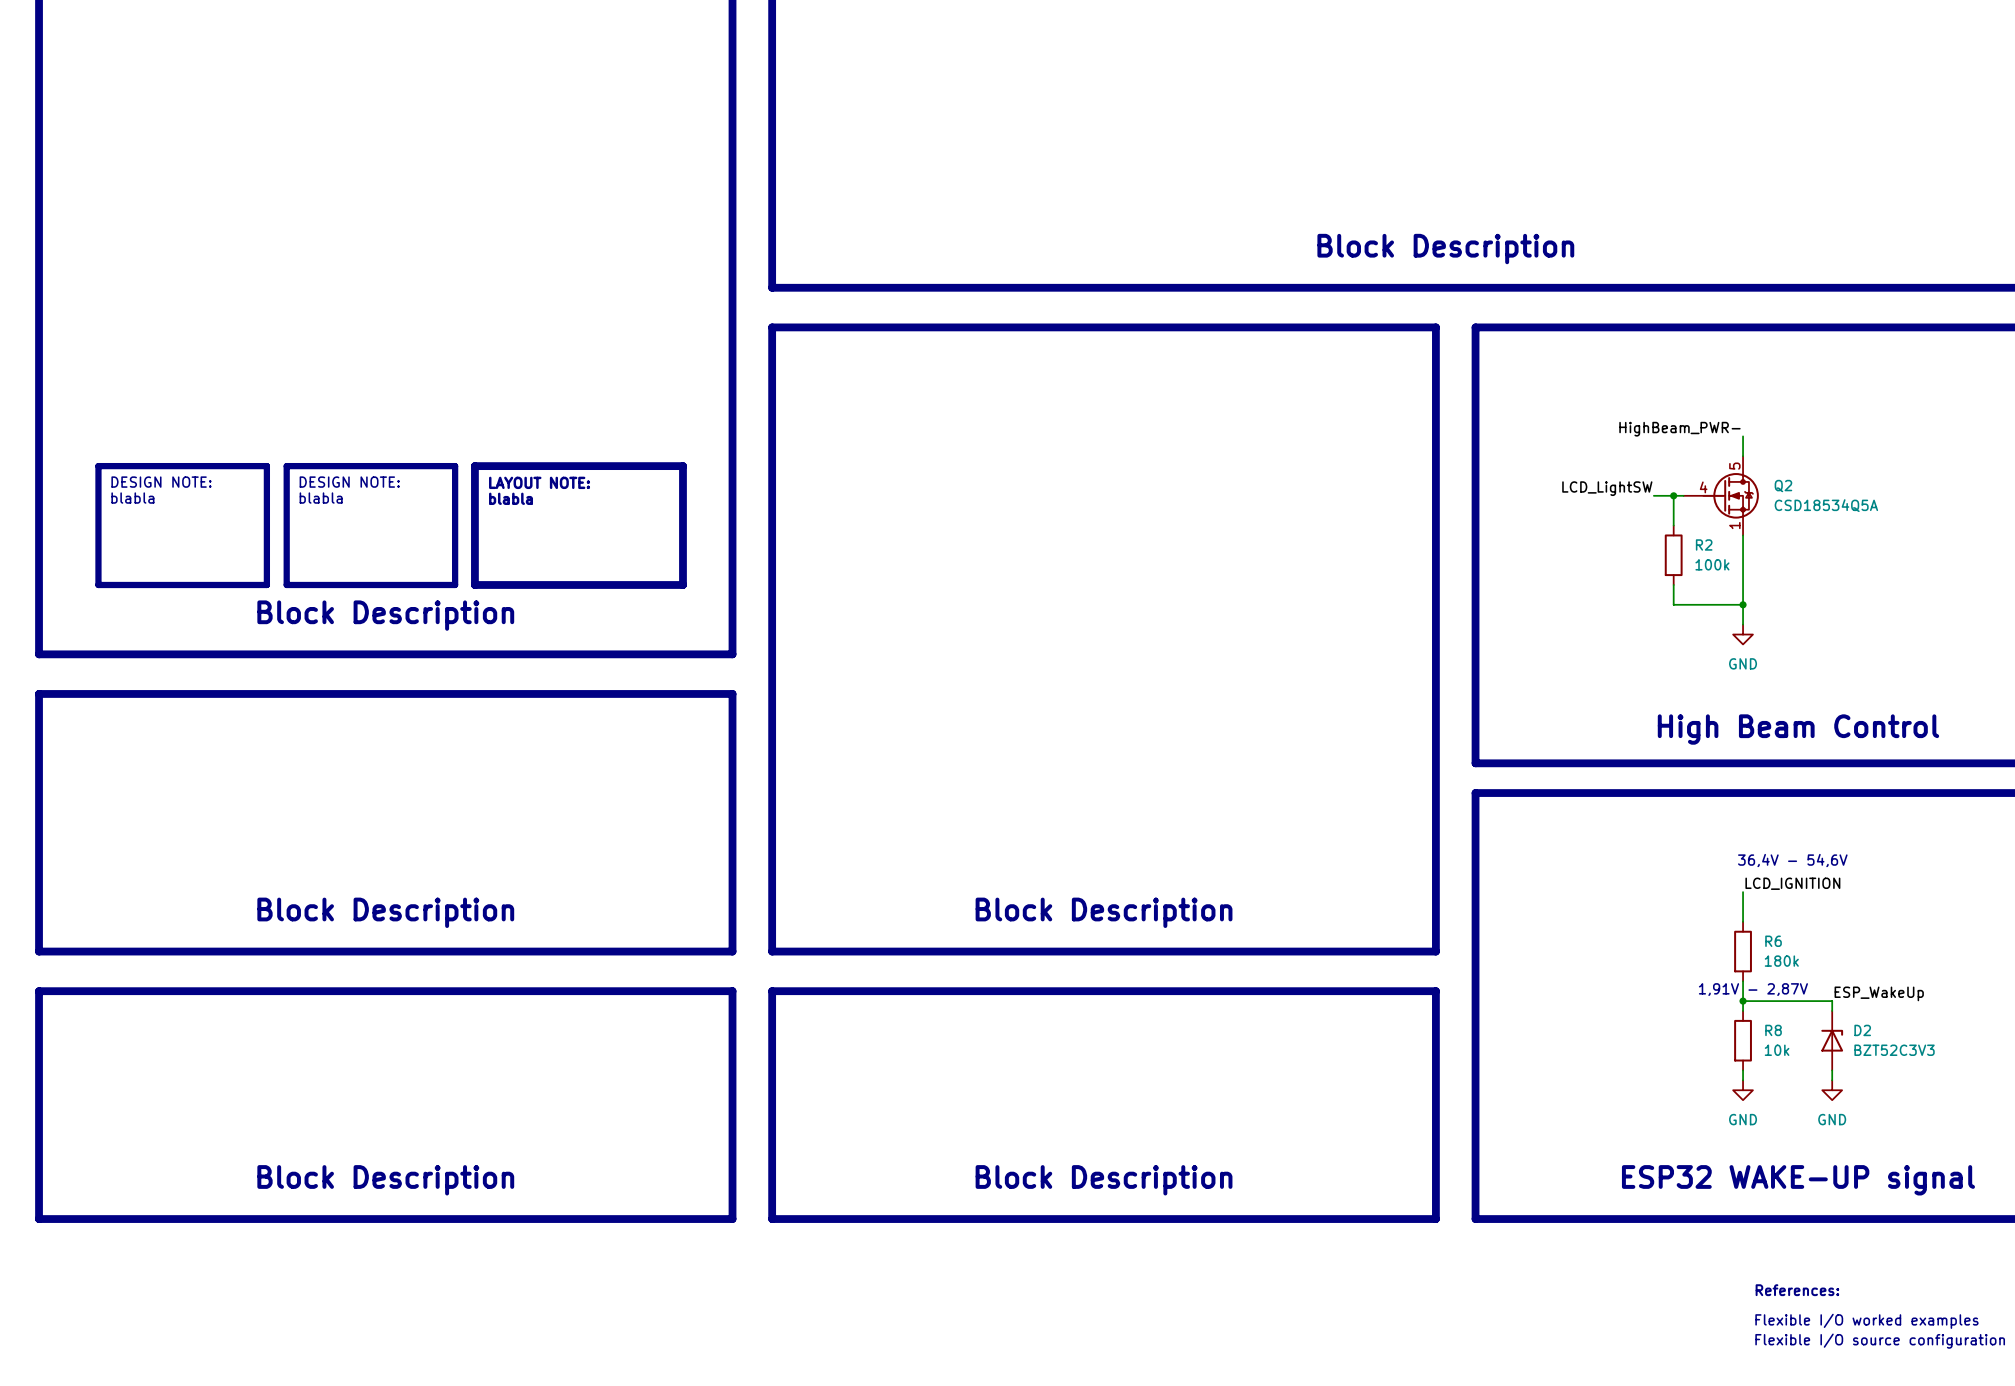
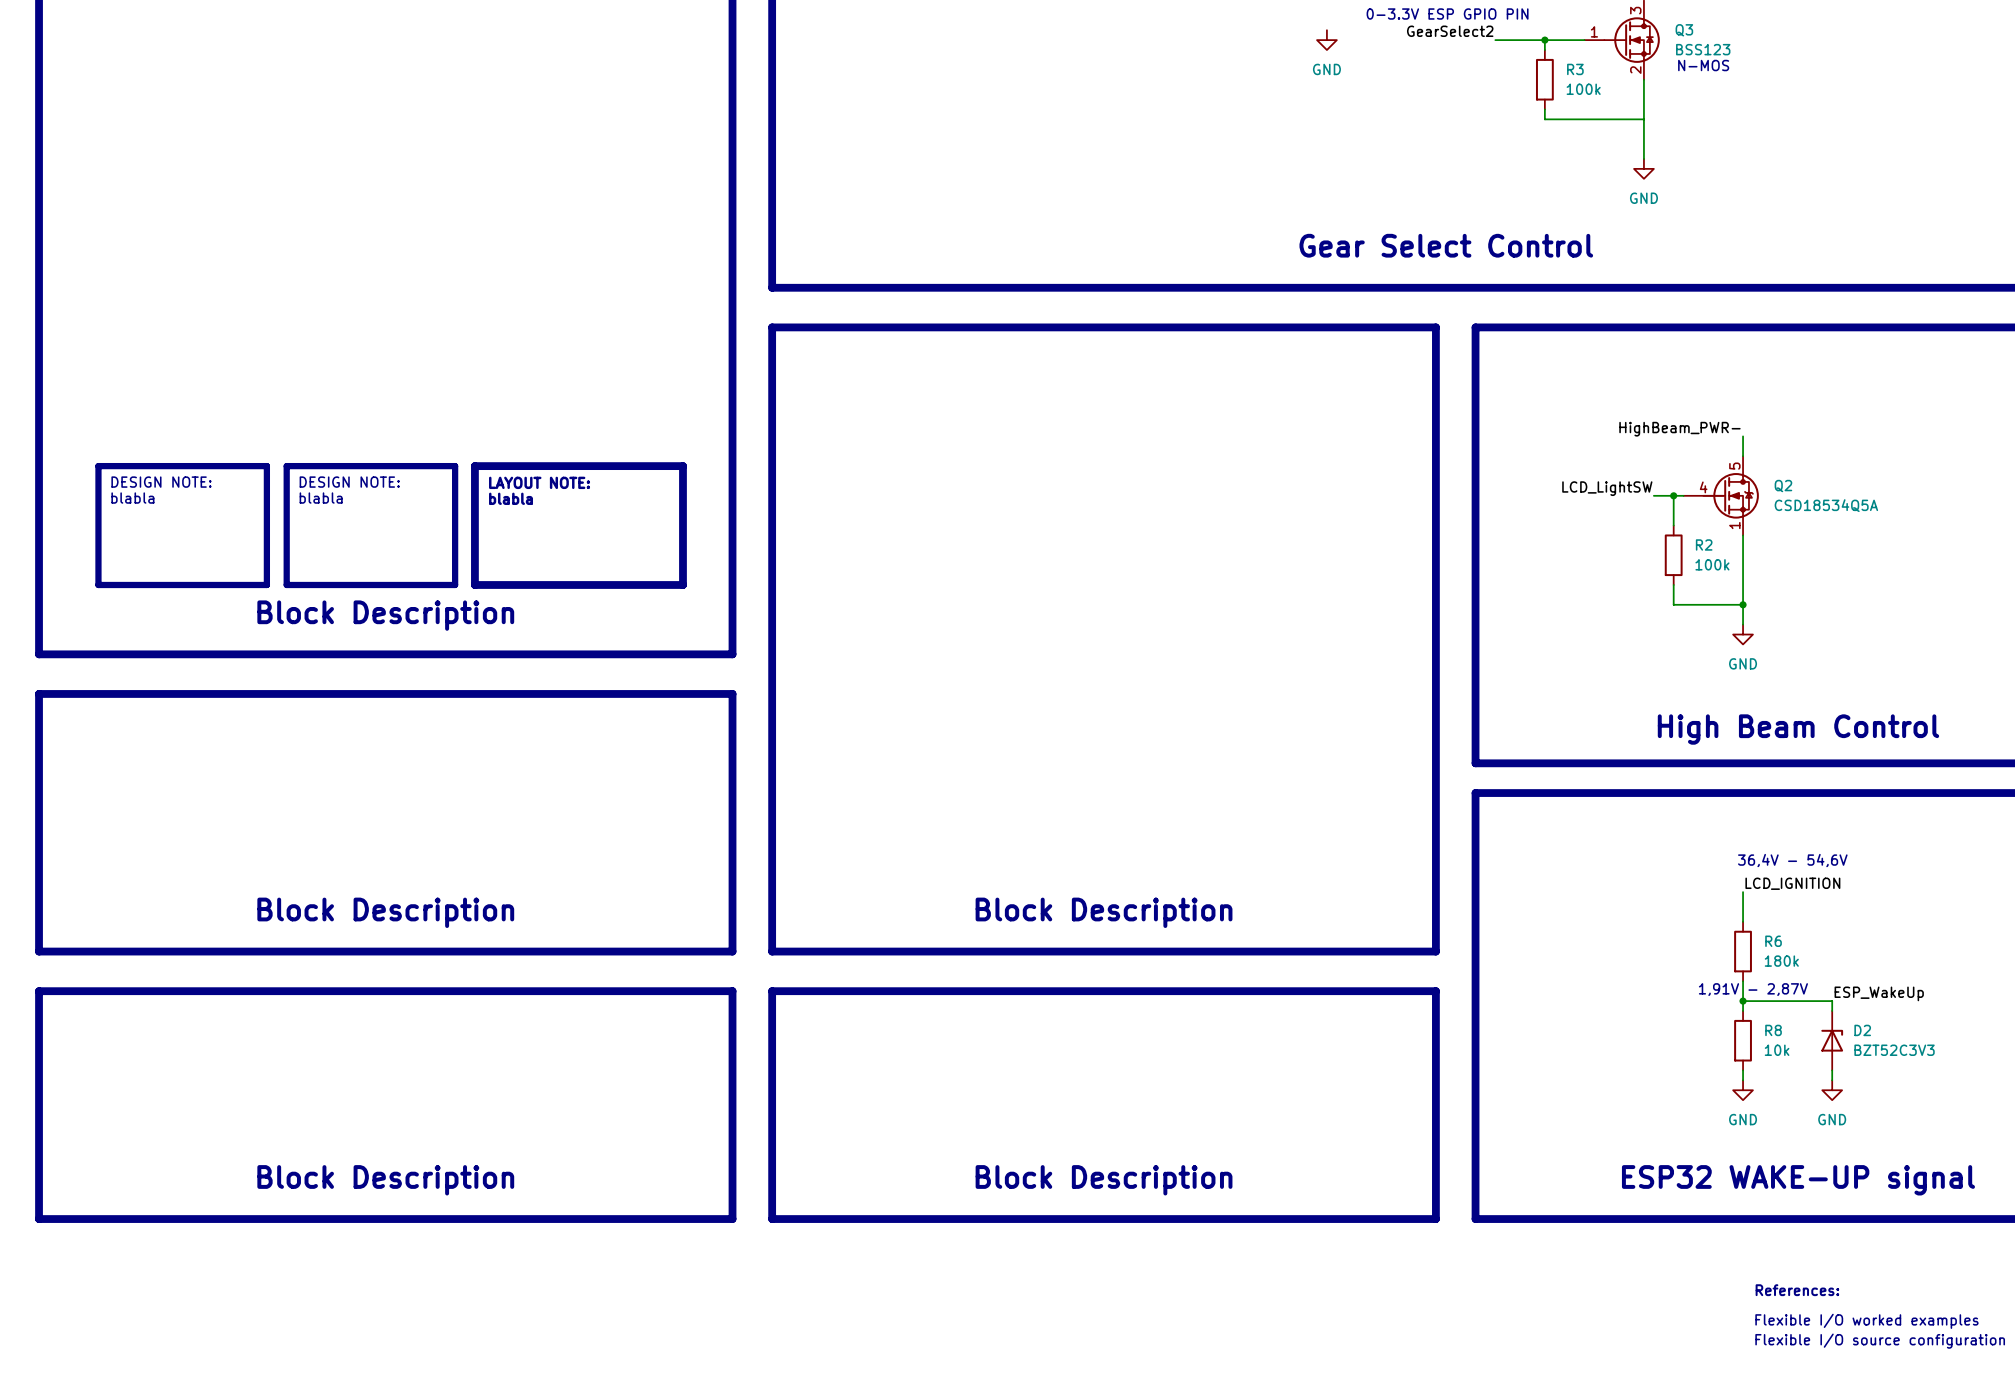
text: none -> 0-3.3V ESP GPIO PIN (1447, 14)
label: none -> GearSelect2 (1450, 31)
power symbol: none -> GND (1326, 40)
wire: none -> (1495, 40) (1584, 40)
wire: none -> (1544, 40) (1544, 50)
junction: none -> (1544, 40)
Q3: none -> BSS123 (1622, 40)
text: none -> N-MOS (1703, 65)
R3: none -> 100k (1544, 79)
wire: none -> (1643, 79) (1643, 158)
wire: none -> (1544, 109) (1544, 119) (1643, 119)
power symbol: none -> GND (1643, 168)
text: Block Description (1445, 249) -> Gear Select Control (1446, 245)

